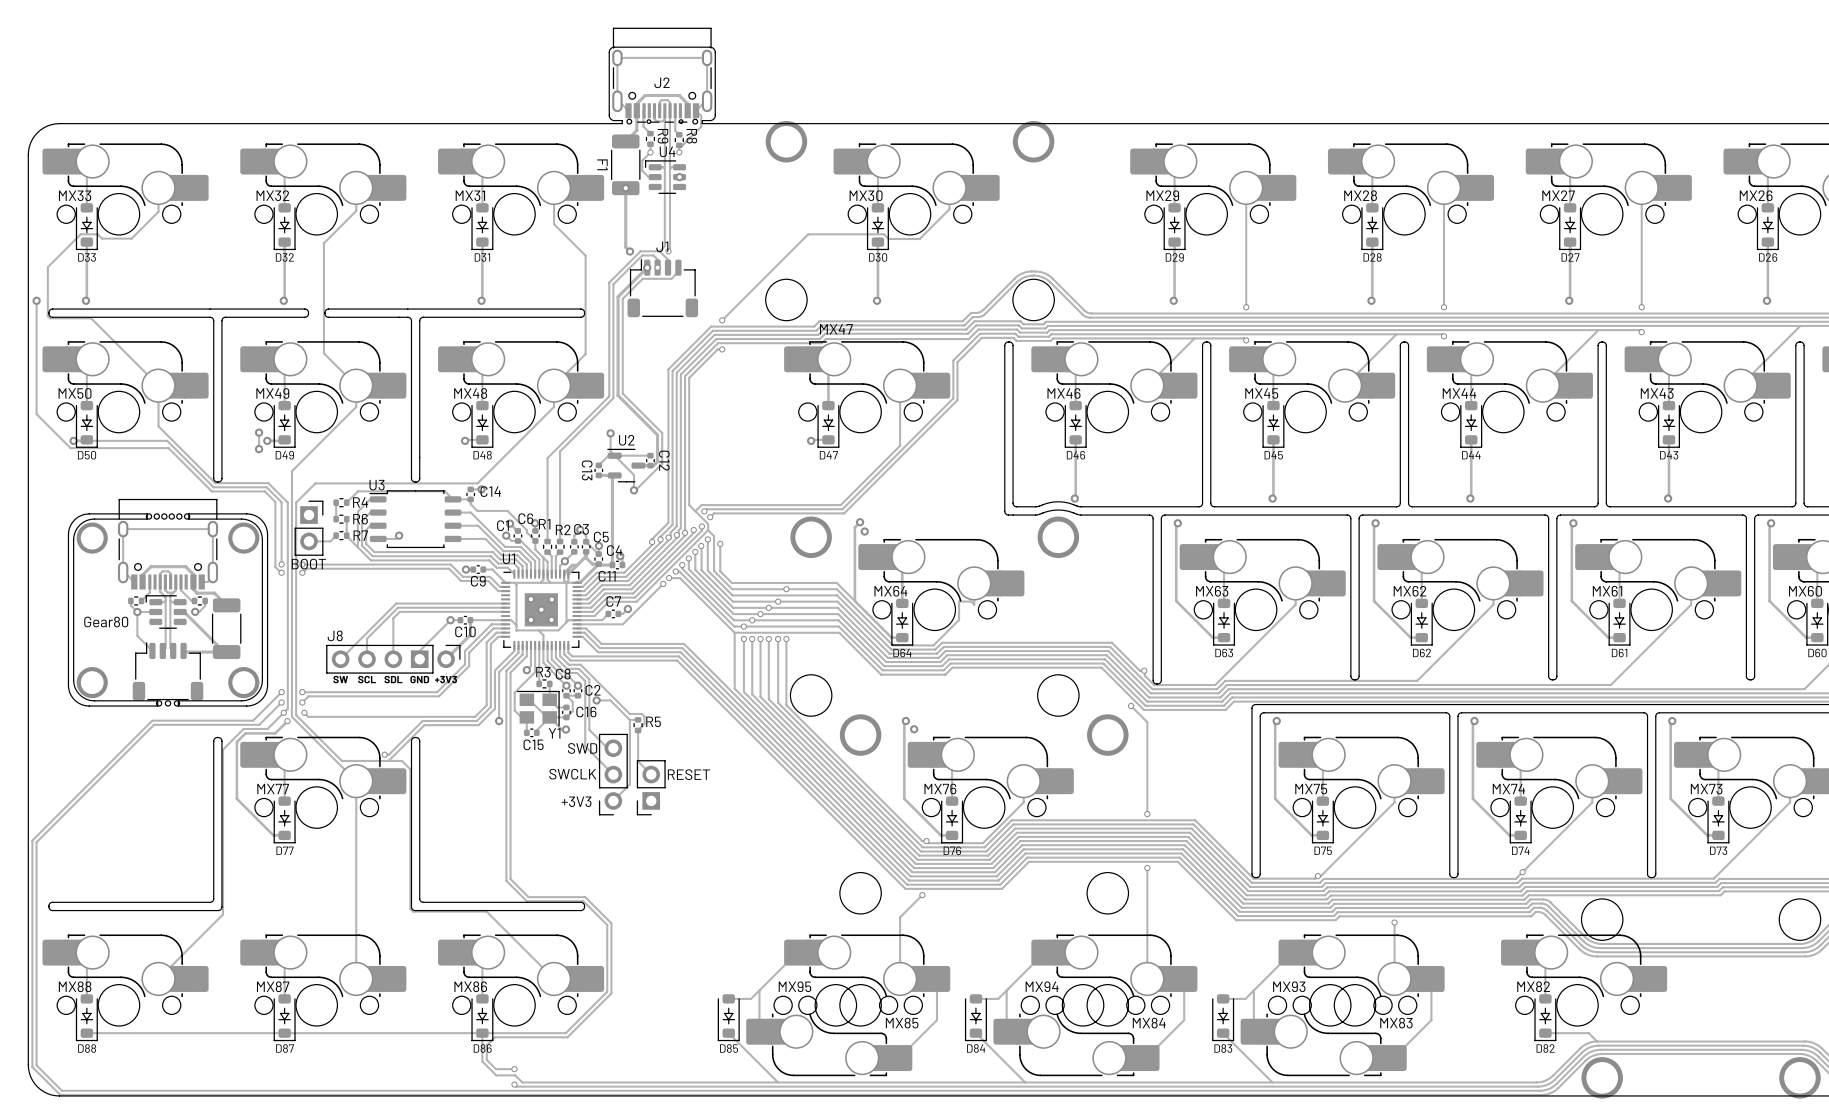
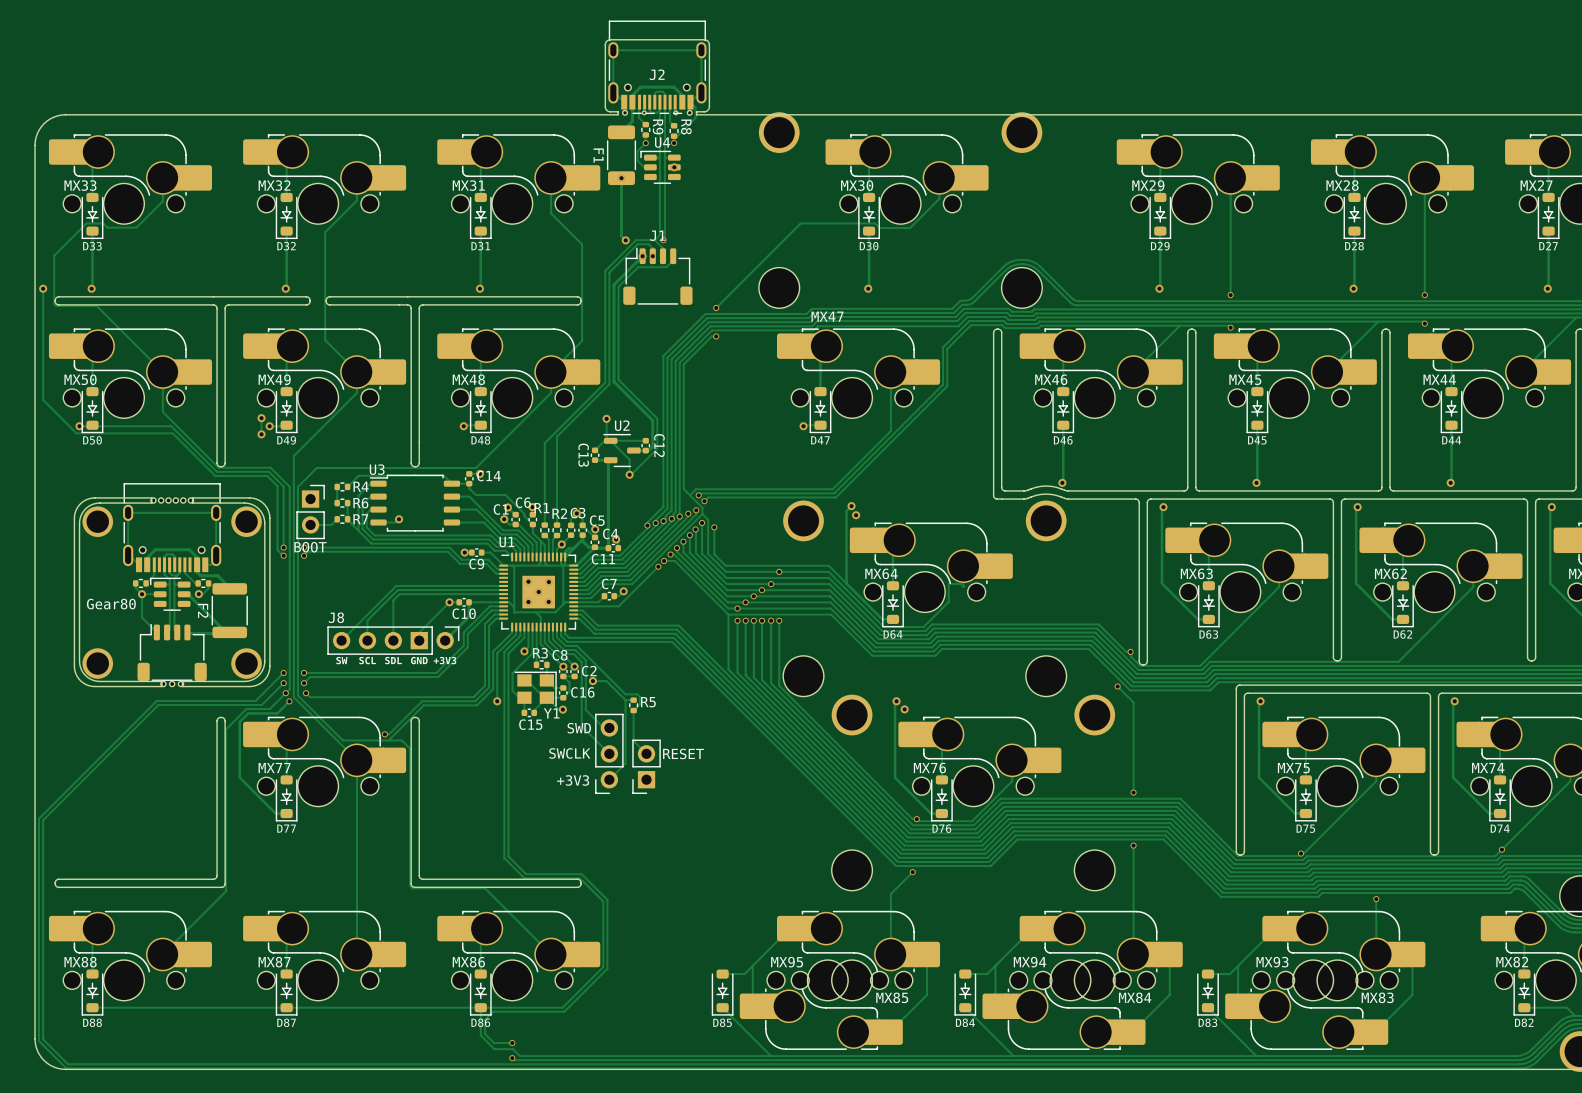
part: (226, 628) -> none
F2: none -> (229, 610)

